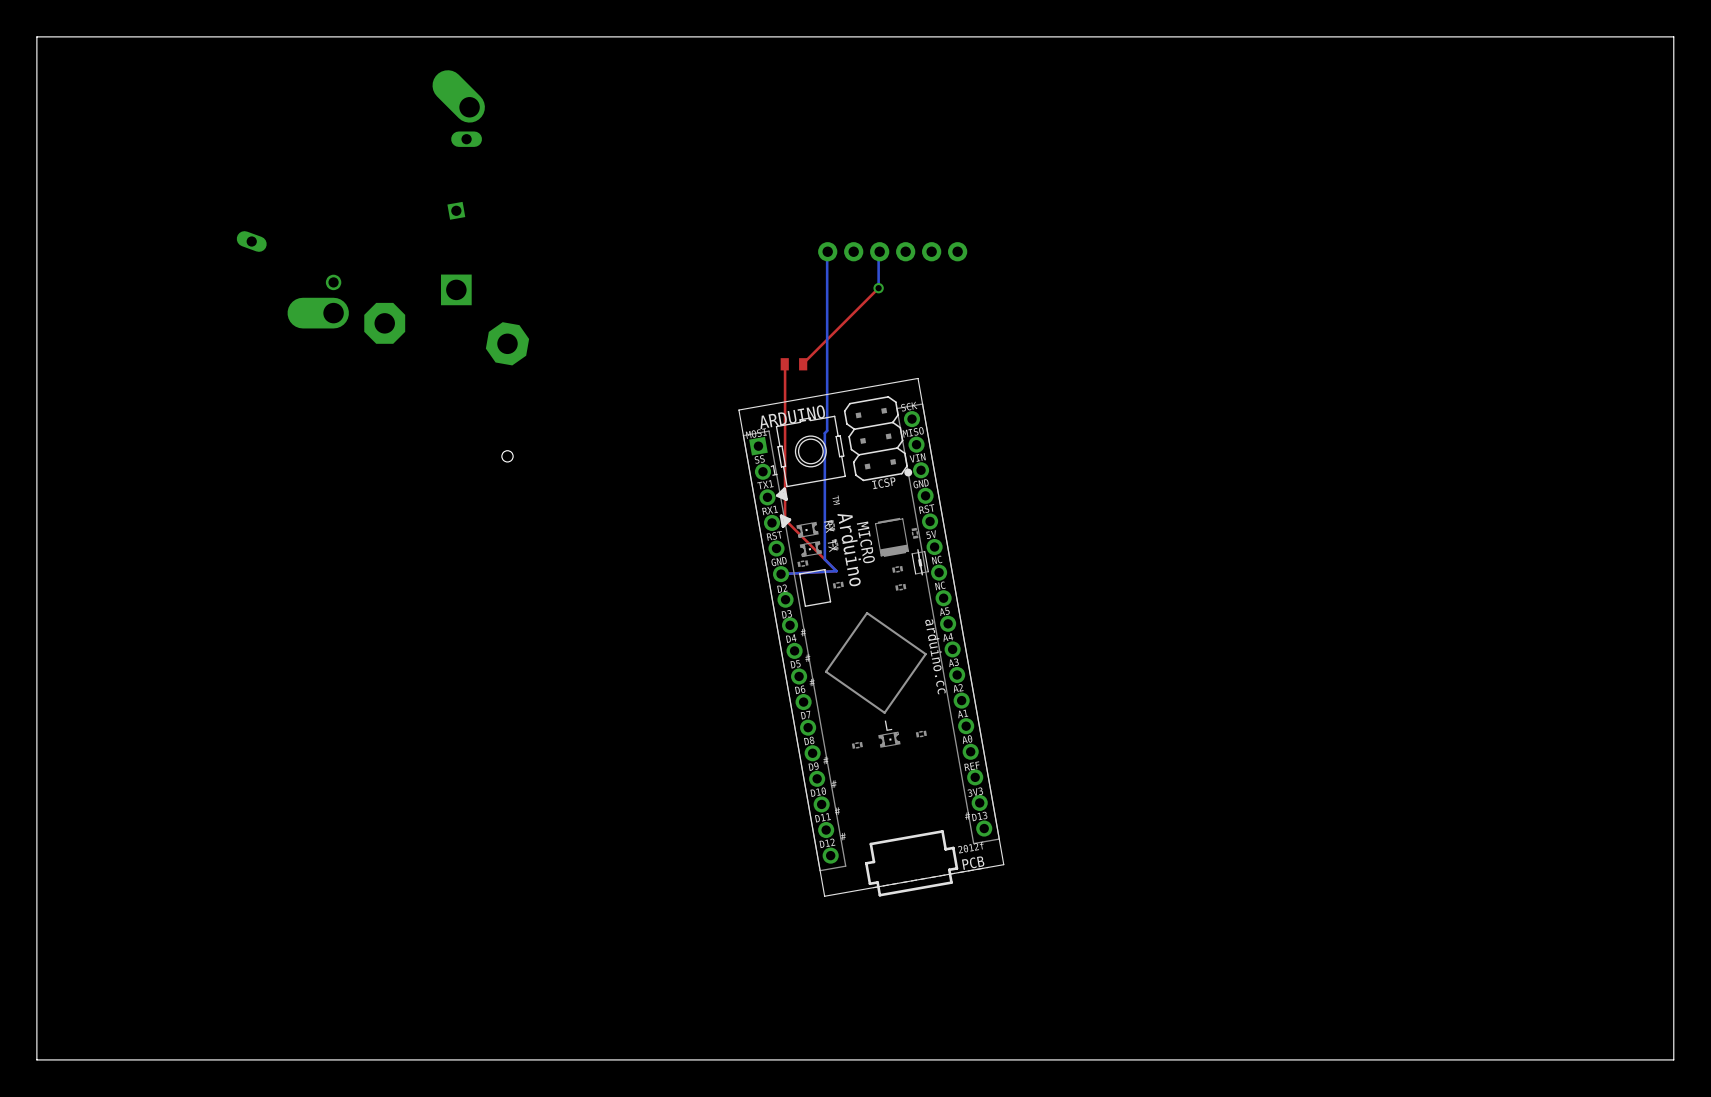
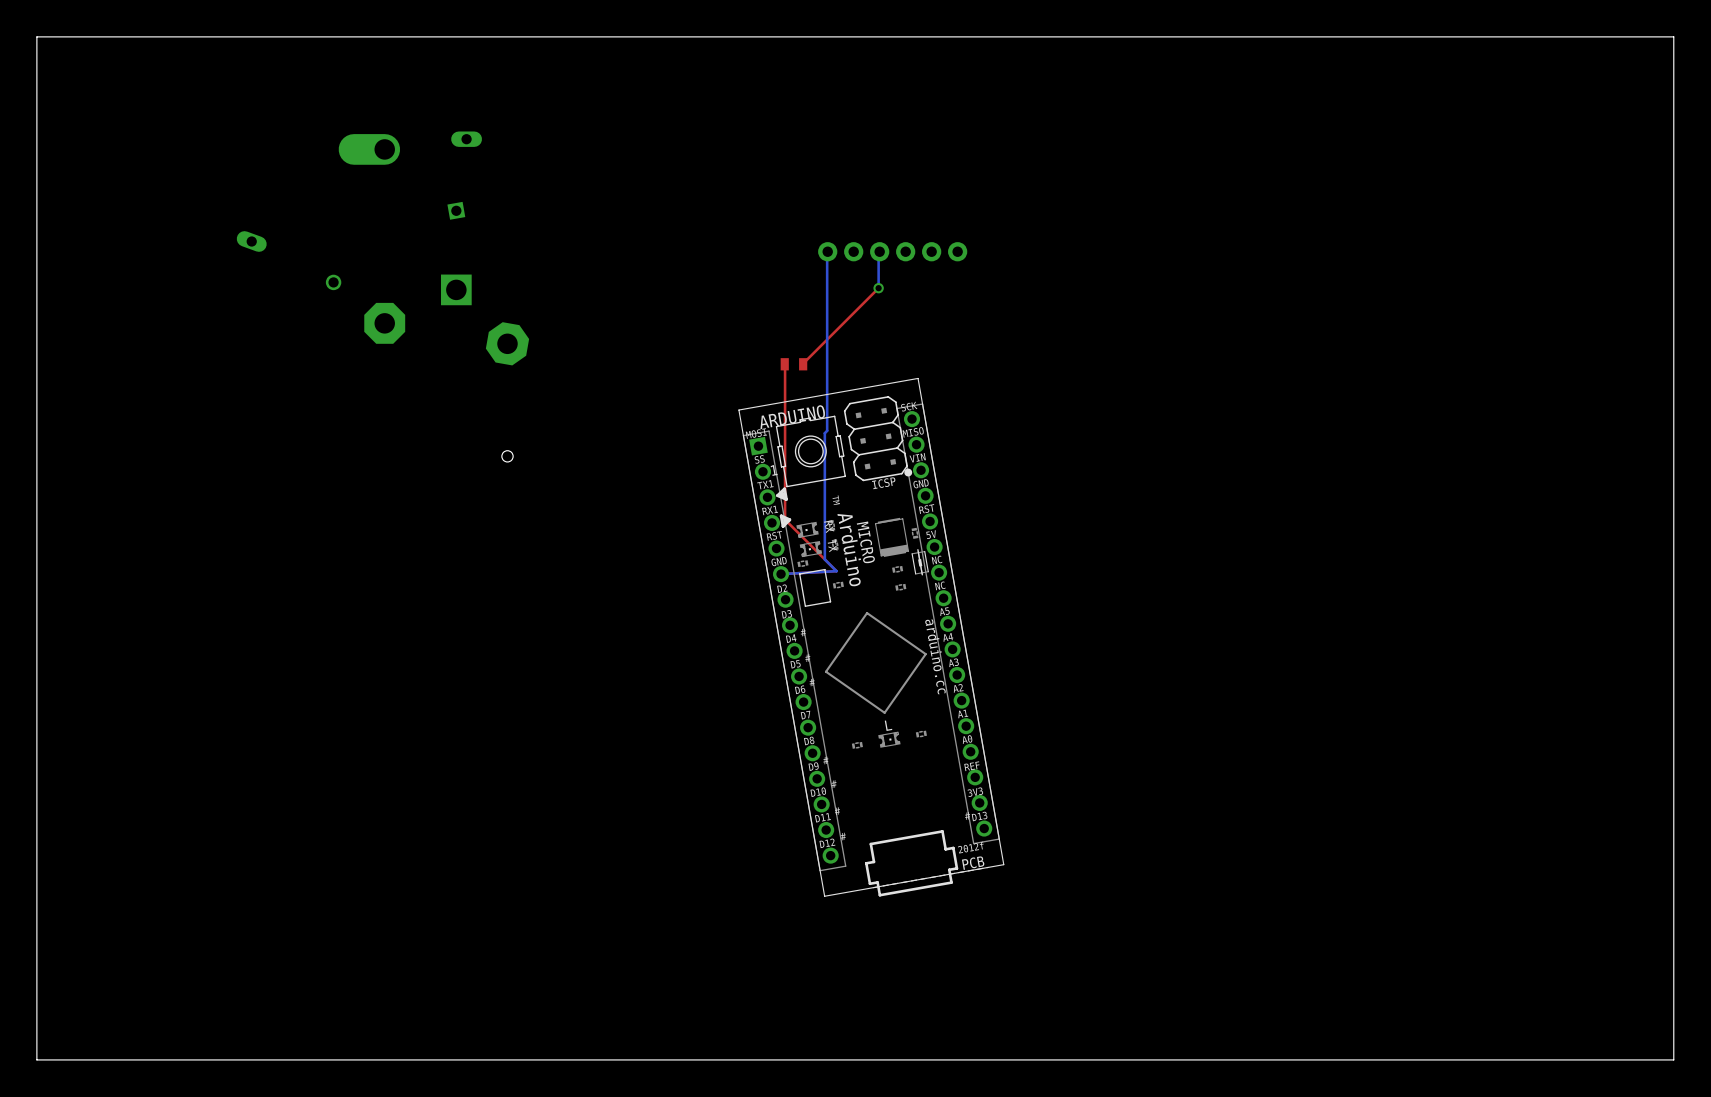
part: (458, 96) -> none
part position: (318, 313) -> (369, 149)

